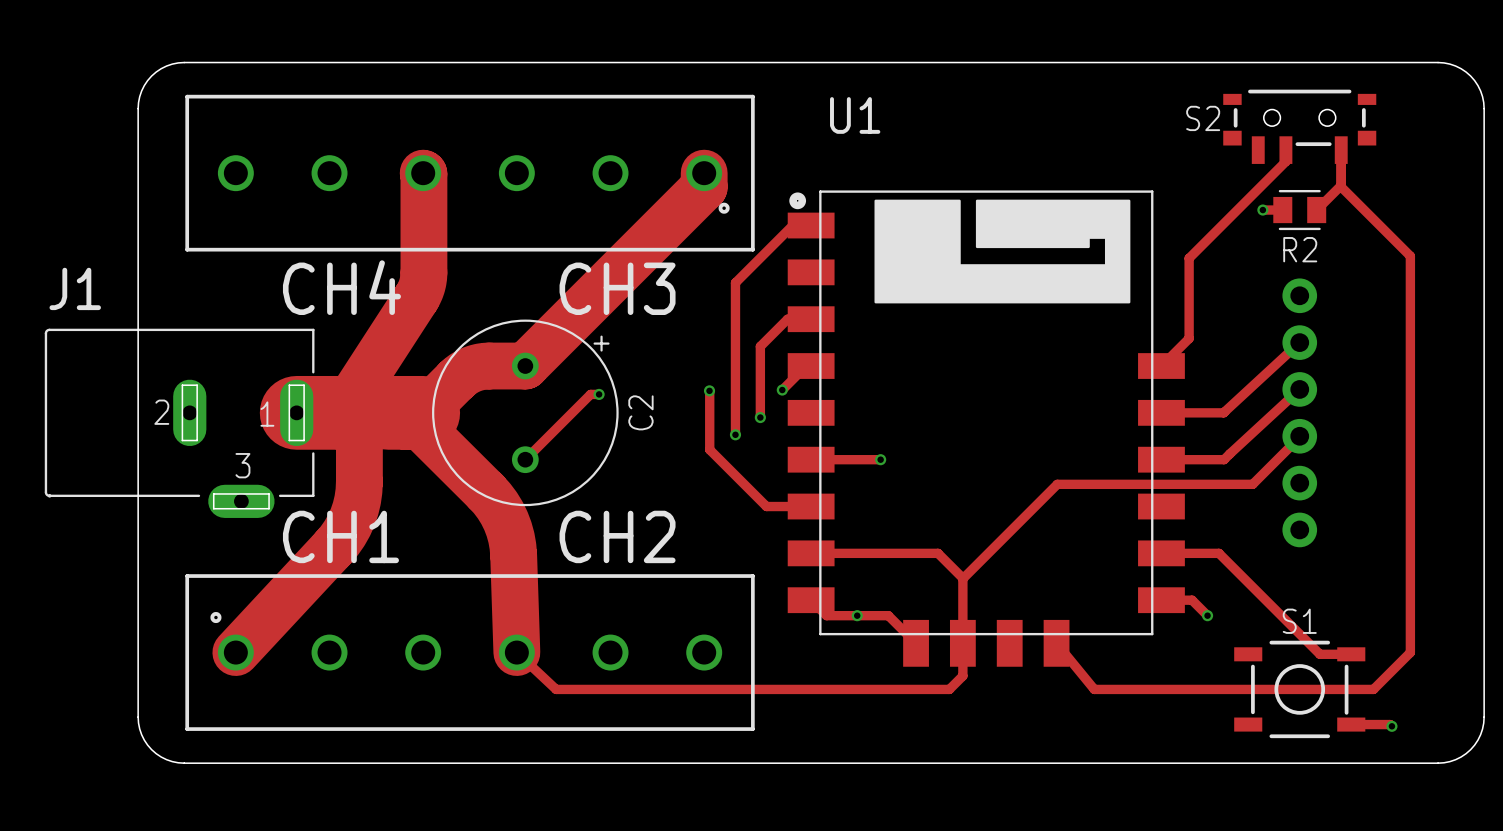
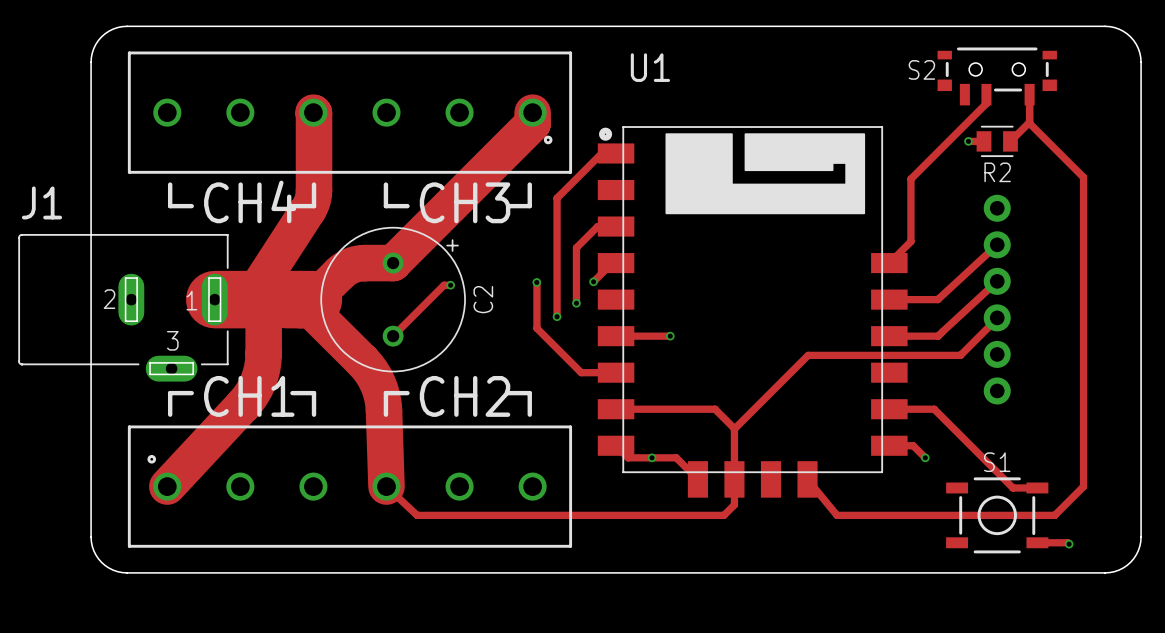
line: none -> (170, 184) (170, 206) (191, 206)
line: none -> (314, 184) (314, 206) (292, 206)
line: none -> (385, 184) (385, 206) (407, 206)
line: none -> (529, 184) (529, 206) (508, 206)
line: none -> (191, 393) (170, 393) (170, 414)
line: none -> (292, 393) (314, 393) (314, 414)
line: none -> (407, 393) (385, 393) (385, 414)
line: none -> (508, 393) (529, 393) (529, 414)

